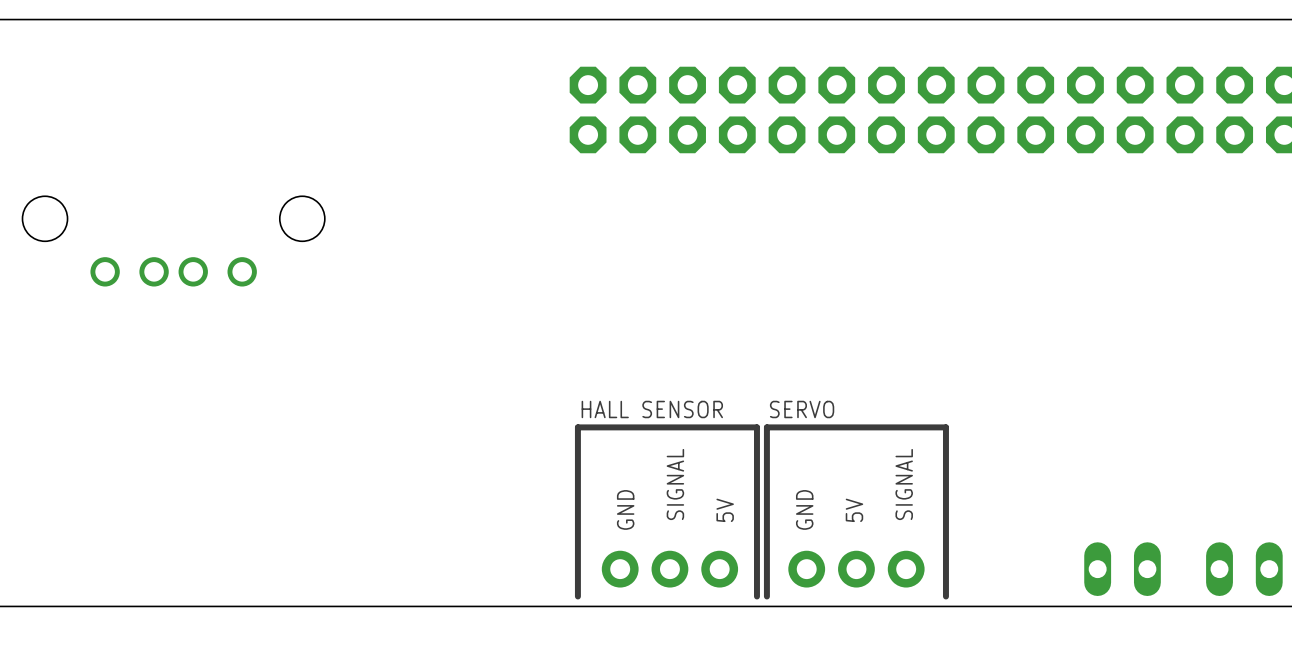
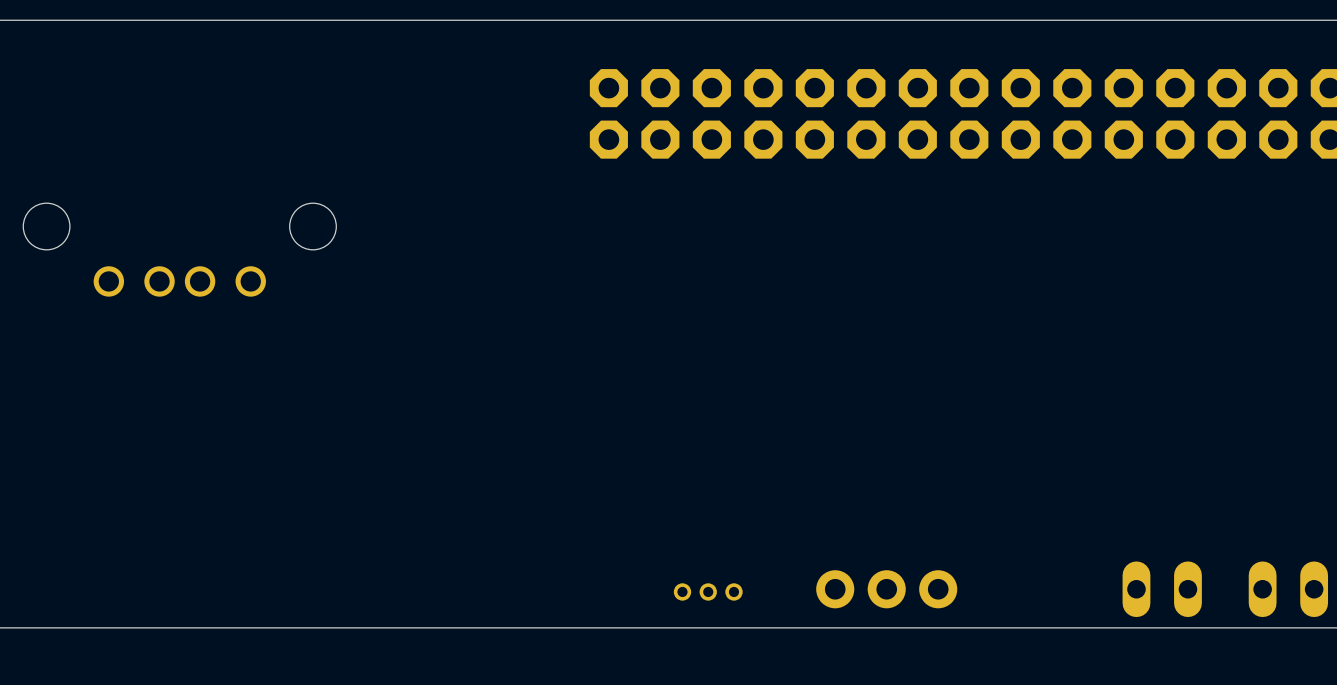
text: HALL SENSOR (652, 409) -> none
text: SERVO (802, 409) -> none
text: SIGNAL (675, 484) -> none
text: SIGNAL (904, 484) -> none
text: GND (625, 509) -> none
text: GND (804, 509) -> none
text: 5V (725, 510) -> none
text: 5V (854, 510) -> none
part footprint: [601, 550, 739, 588] -> [673, 583, 743, 601]
line: (756, 596) (756, 427) (577, 427) (577, 596) -> none
line: (945, 596) (945, 427) (766, 427) (766, 596) -> none

